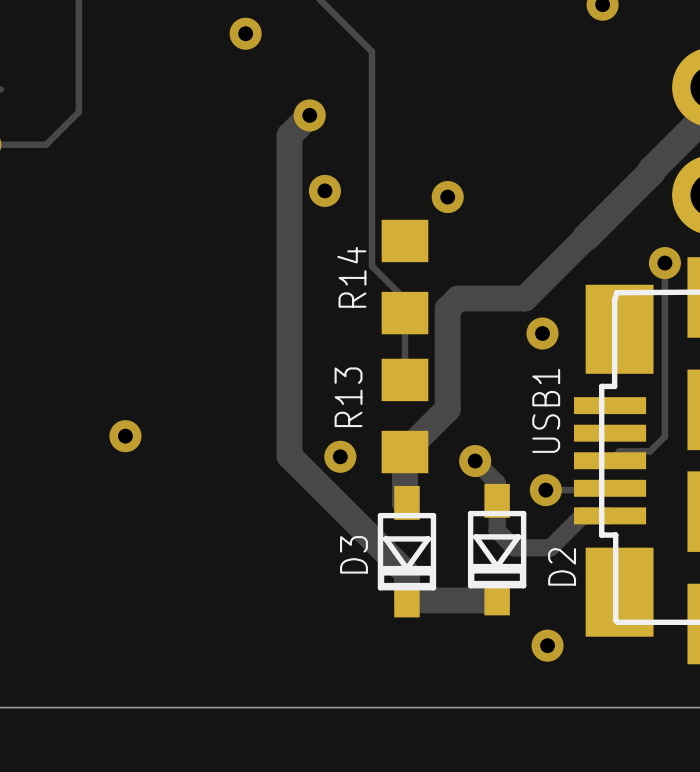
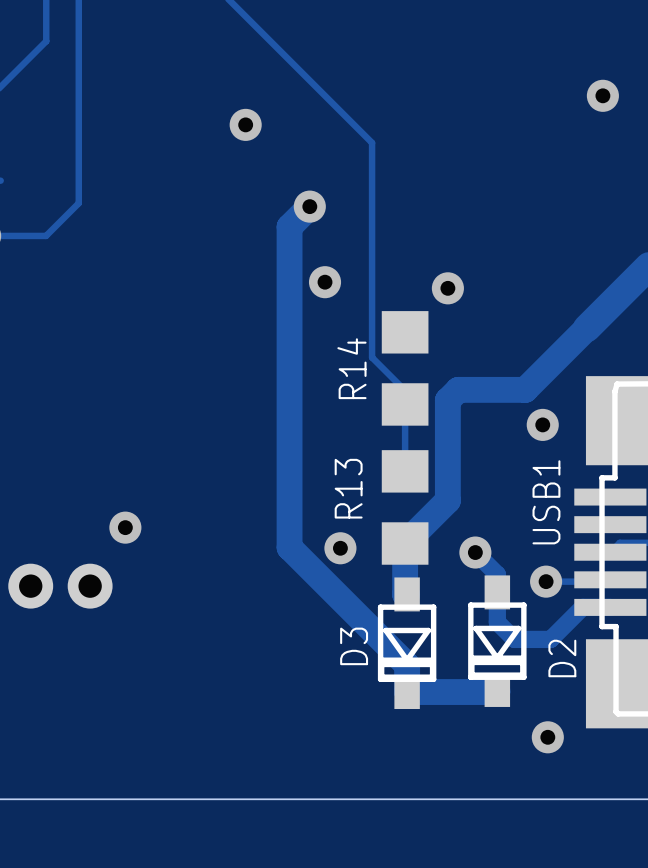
part: none -> (60, 586)

